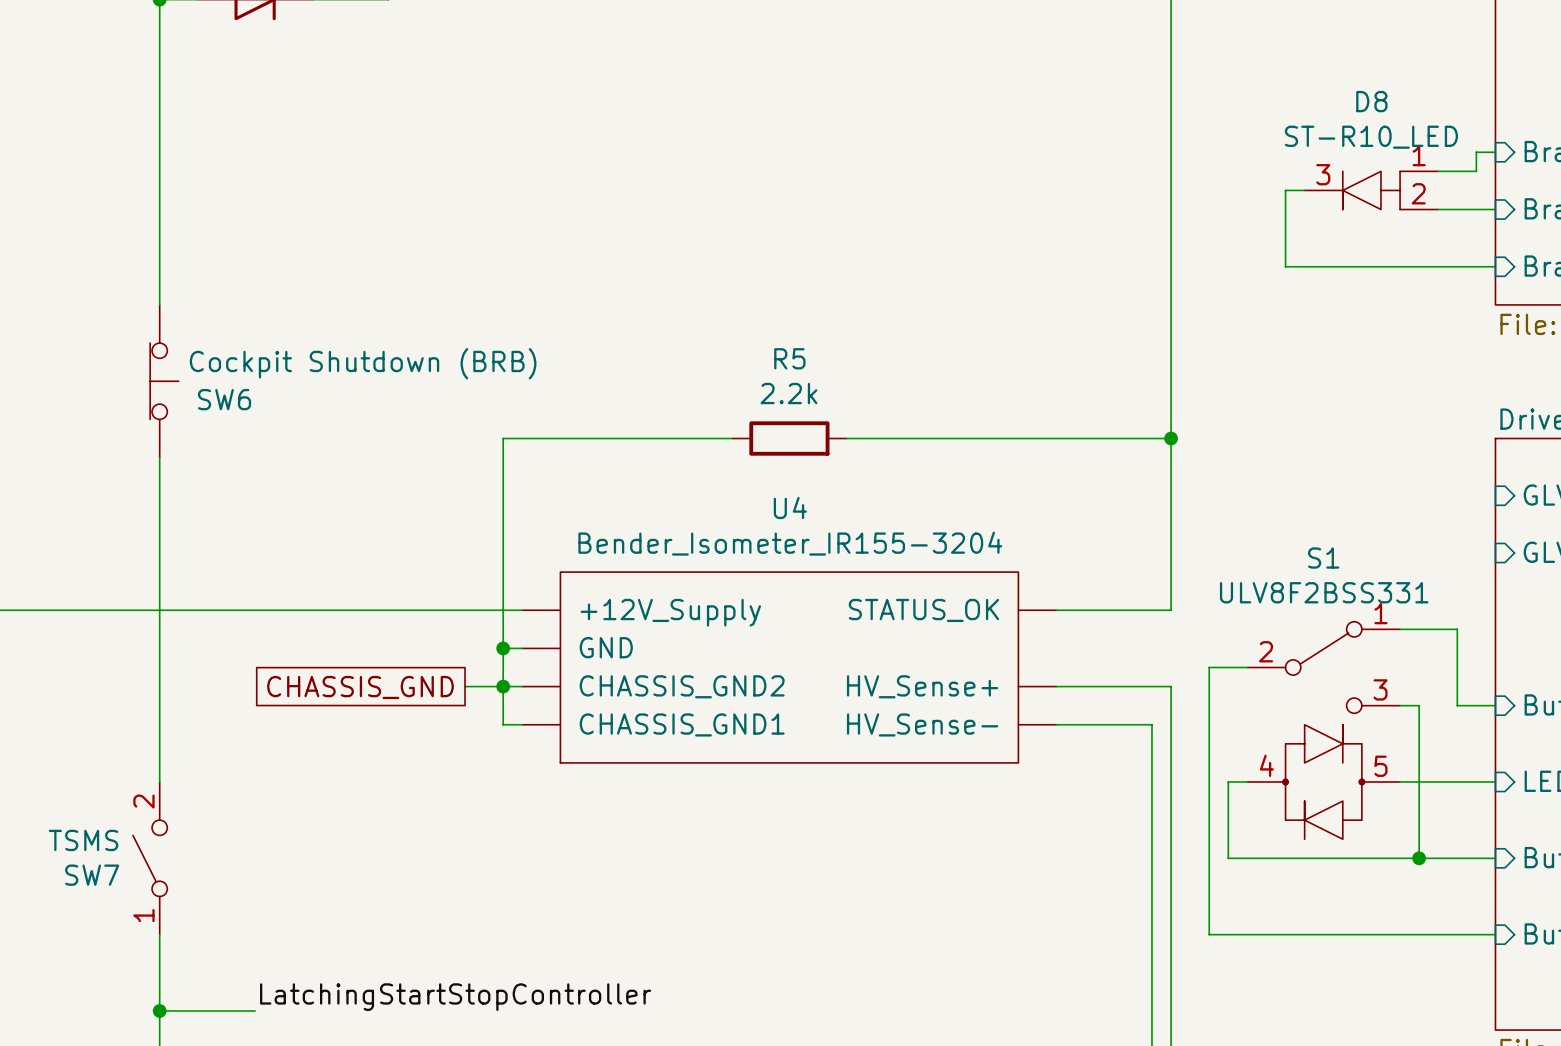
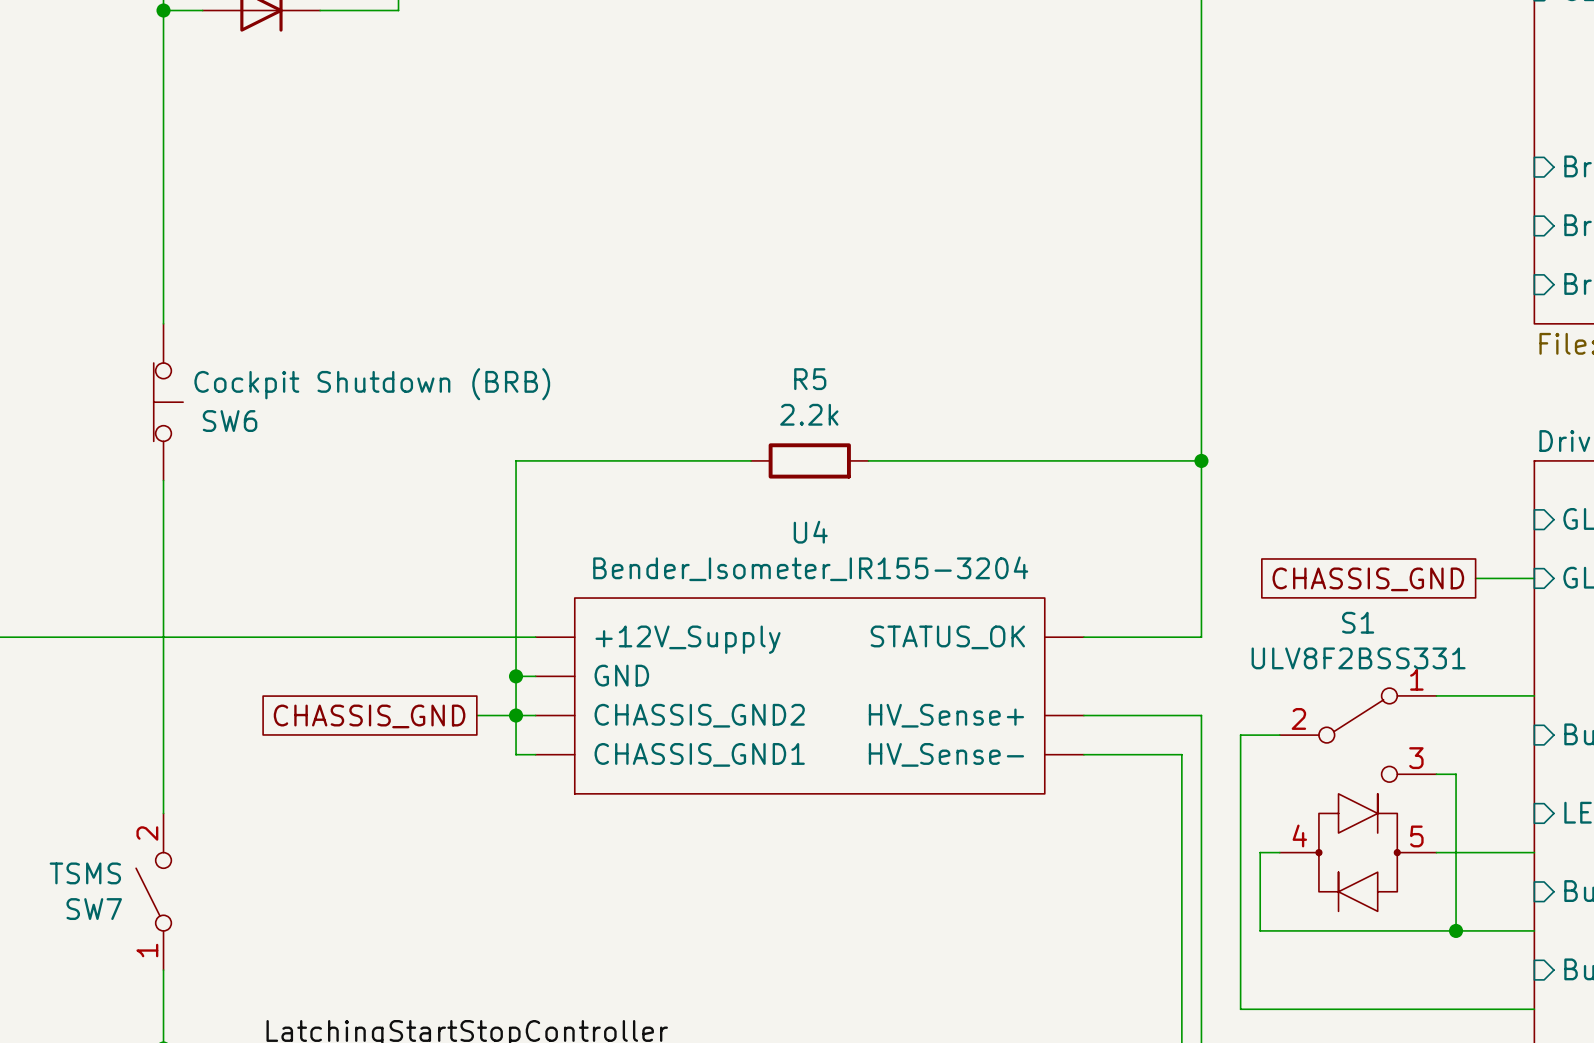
wire: (1495, 152) (1476, 152) (1476, 171) (1438, 171) -> none
wire: (1304, 190) (1285, 190) (1285, 266) (1495, 266) -> none
D8: ST-R10_LED (1371, 190) -> none
wire: (1438, 209) (1495, 209) -> (1475, 578) (1534, 578)
global label: none -> CHASSIS_GND (1368, 579)
wire: (1400, 629) (1457, 629) (1457, 705) (1495, 705) -> none
wire: (1247, 667) (1209, 667) (1209, 705) -> (1279, 735) (1240, 735)
wire: none -> (1436, 695) (1534, 695)
wire: (1400, 705) (1419, 705) (1419, 743) -> (1436, 774) (1456, 774)
S1 position: (1323, 730) -> (1358, 799)
wire: (1247, 782) (1228, 782) (1228, 820) -> (1279, 852) (1260, 852)
wire: (1400, 782) (1495, 782) -> (1436, 852) (1534, 852)
wire: (1228, 858) (1495, 858) -> (1260, 891) (1260, 930) (1534, 930)
wire: none -> (1456, 891) (1456, 930)
junction position: (1419, 858) -> (1456, 930)
wire: (1209, 934) (1495, 934) -> (1240, 970) (1240, 1009) (1534, 1009)

